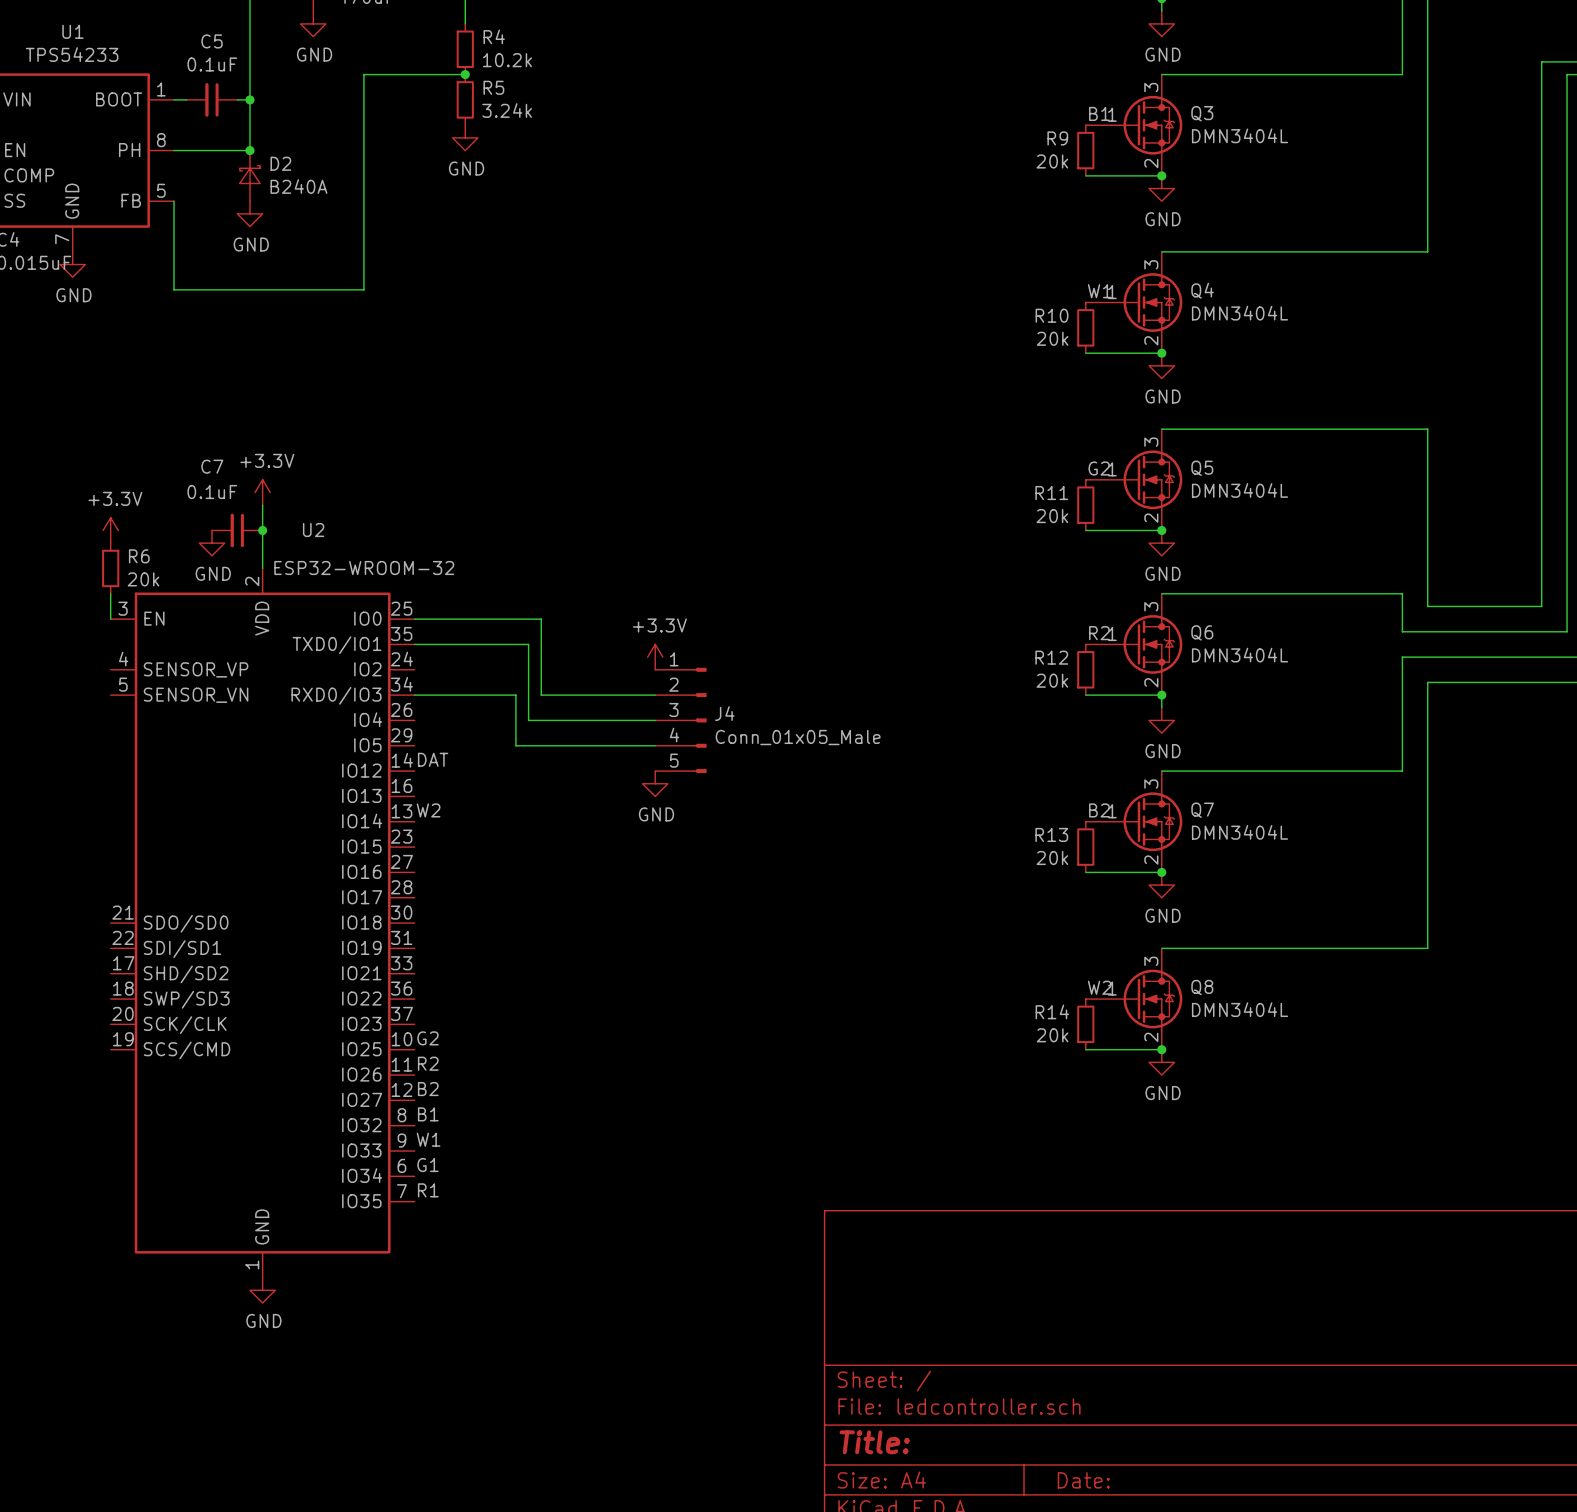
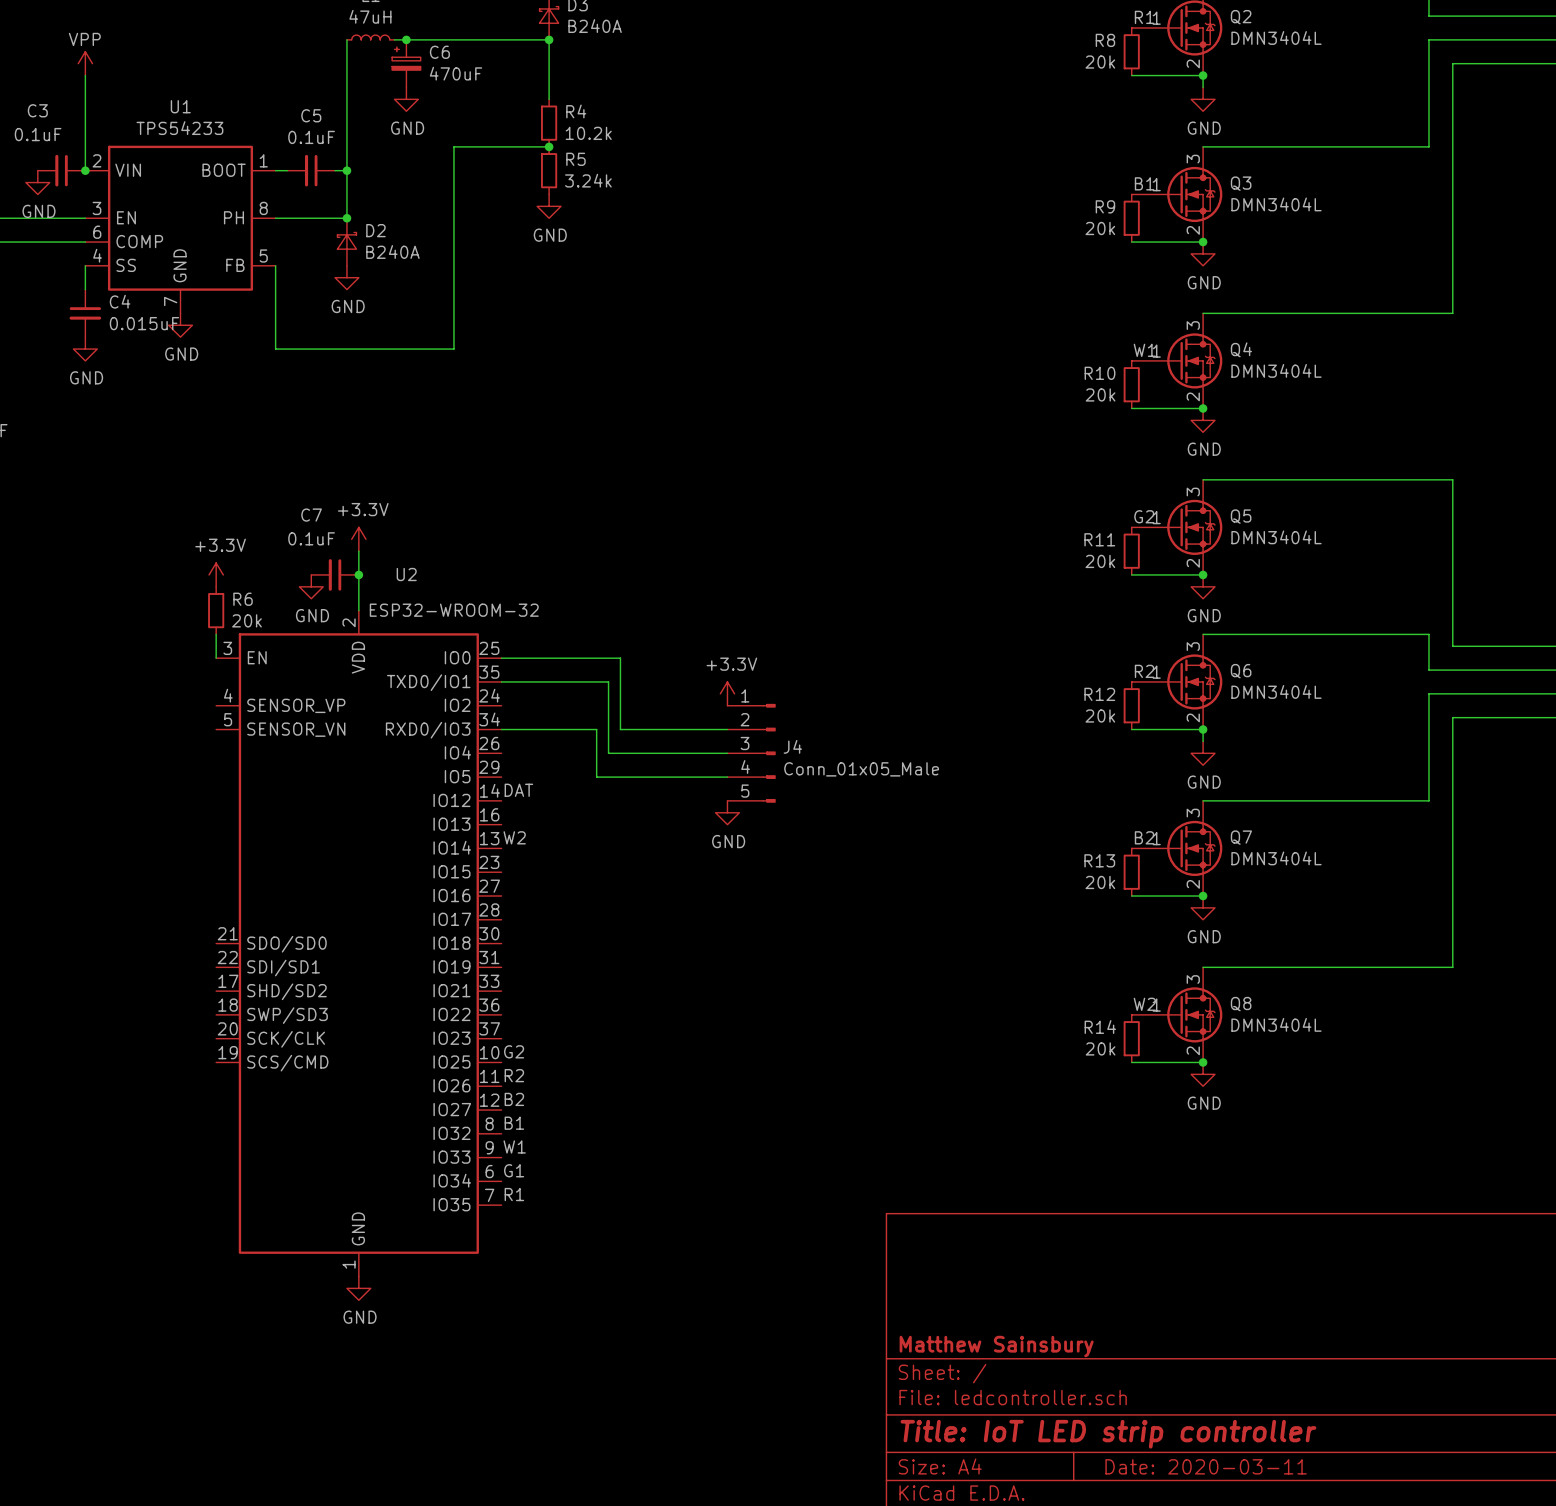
title block: none -> Matthew Sainsbury (996, 1346)
title block: Title: (874, 1442) -> Title: IoT LED strip controller (1108, 1434)
title block: Date: (1083, 1480) -> Date: 2020-03-11 (1206, 1466)

